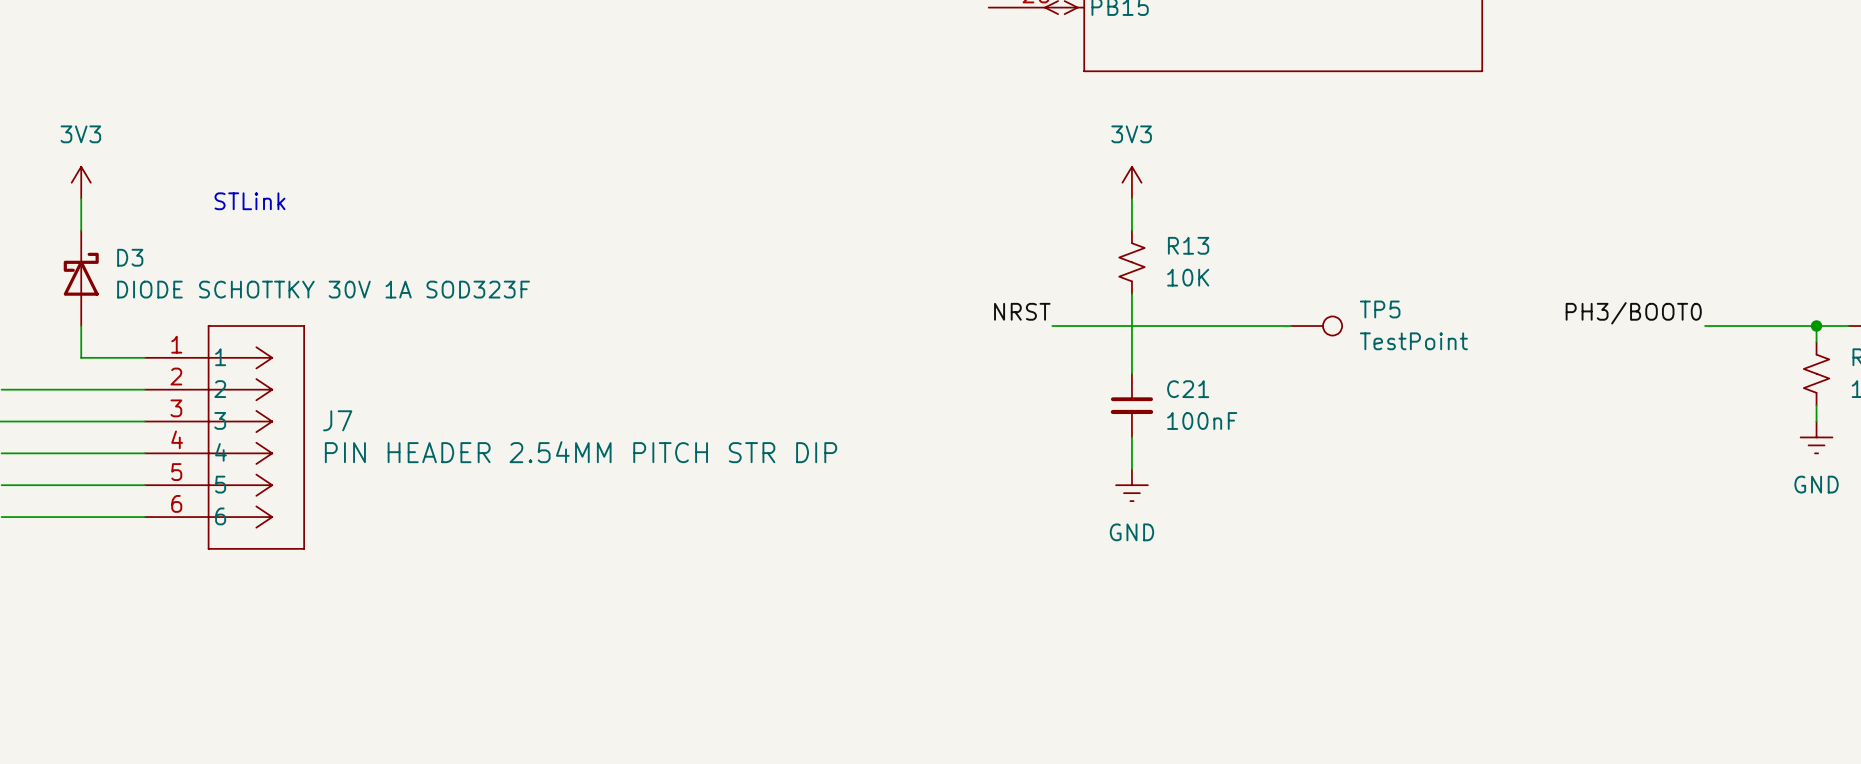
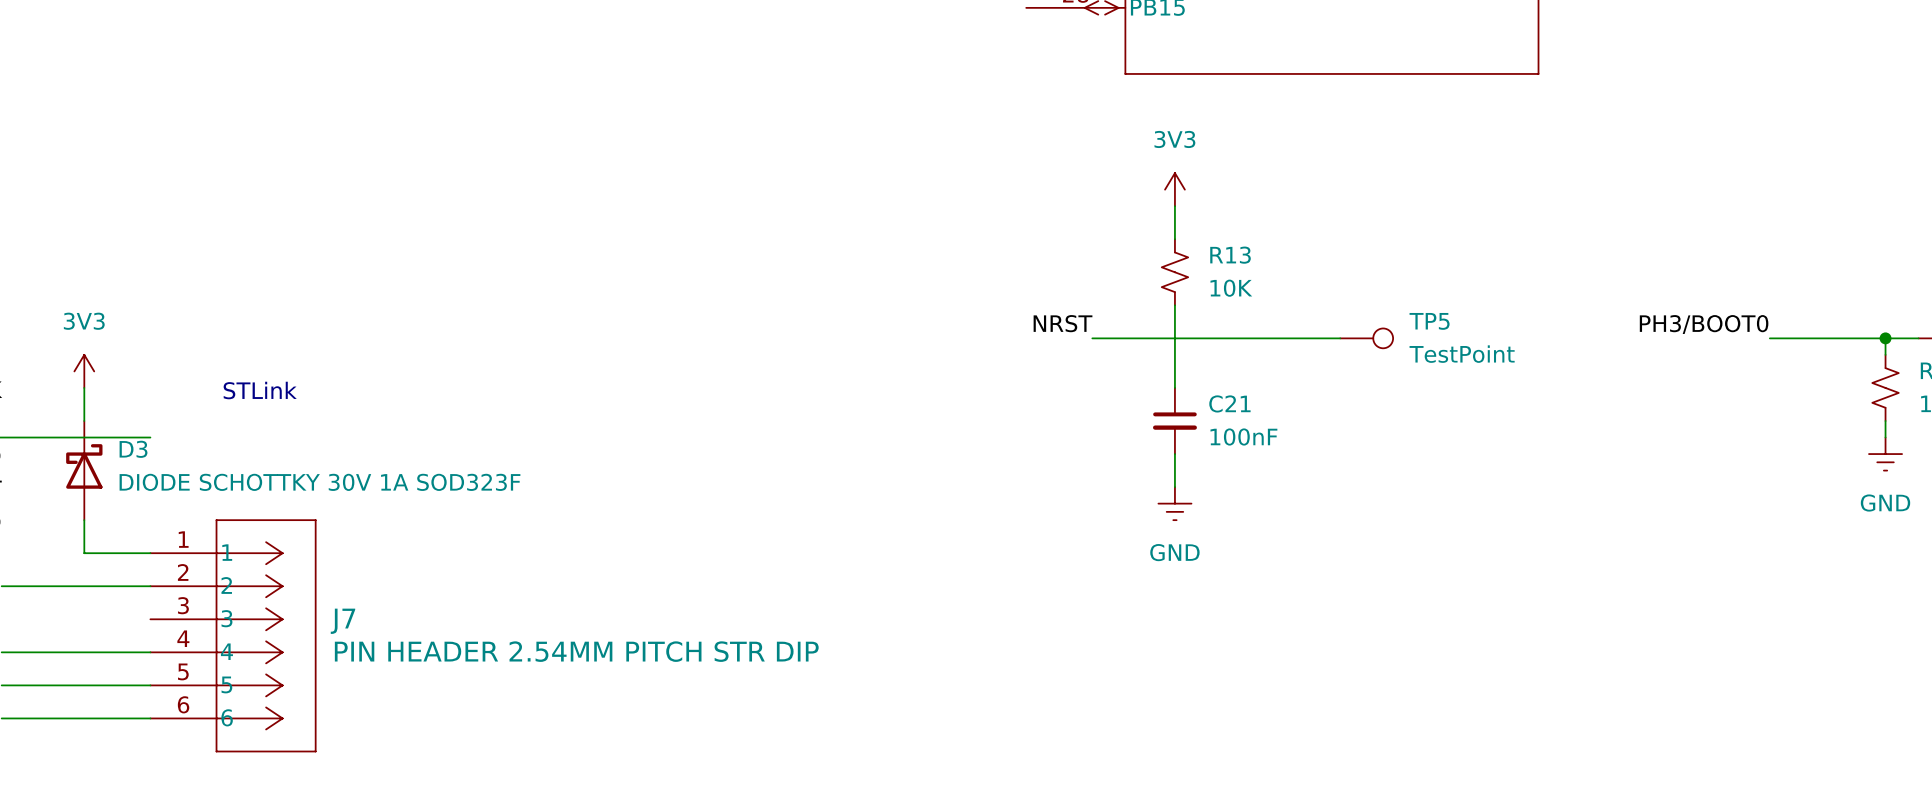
power symbol position: 3V3 (81, 182) -> 3V3 (84, 371)
wire: (81, 198) (81, 230) -> (84, 387) (84, 421)
text position: STLink (249, 201) -> STLink (260, 390)
D3 position: (81, 278) -> (84, 470)
wire: (81, 325) (81, 357) (144, 357) -> (84, 520) (84, 553) (150, 553)
wire: (1, 389) (144, 389) -> (1, 586) (150, 586)
J7 position: (224, 437) -> (233, 635)
wire: (1, 453) (144, 453) -> (1, 652) (150, 652)
wire: (1, 485) (144, 485) -> (1, 685) (150, 685)
wire: (1, 517) (144, 517) -> (1, 718) (150, 718)

